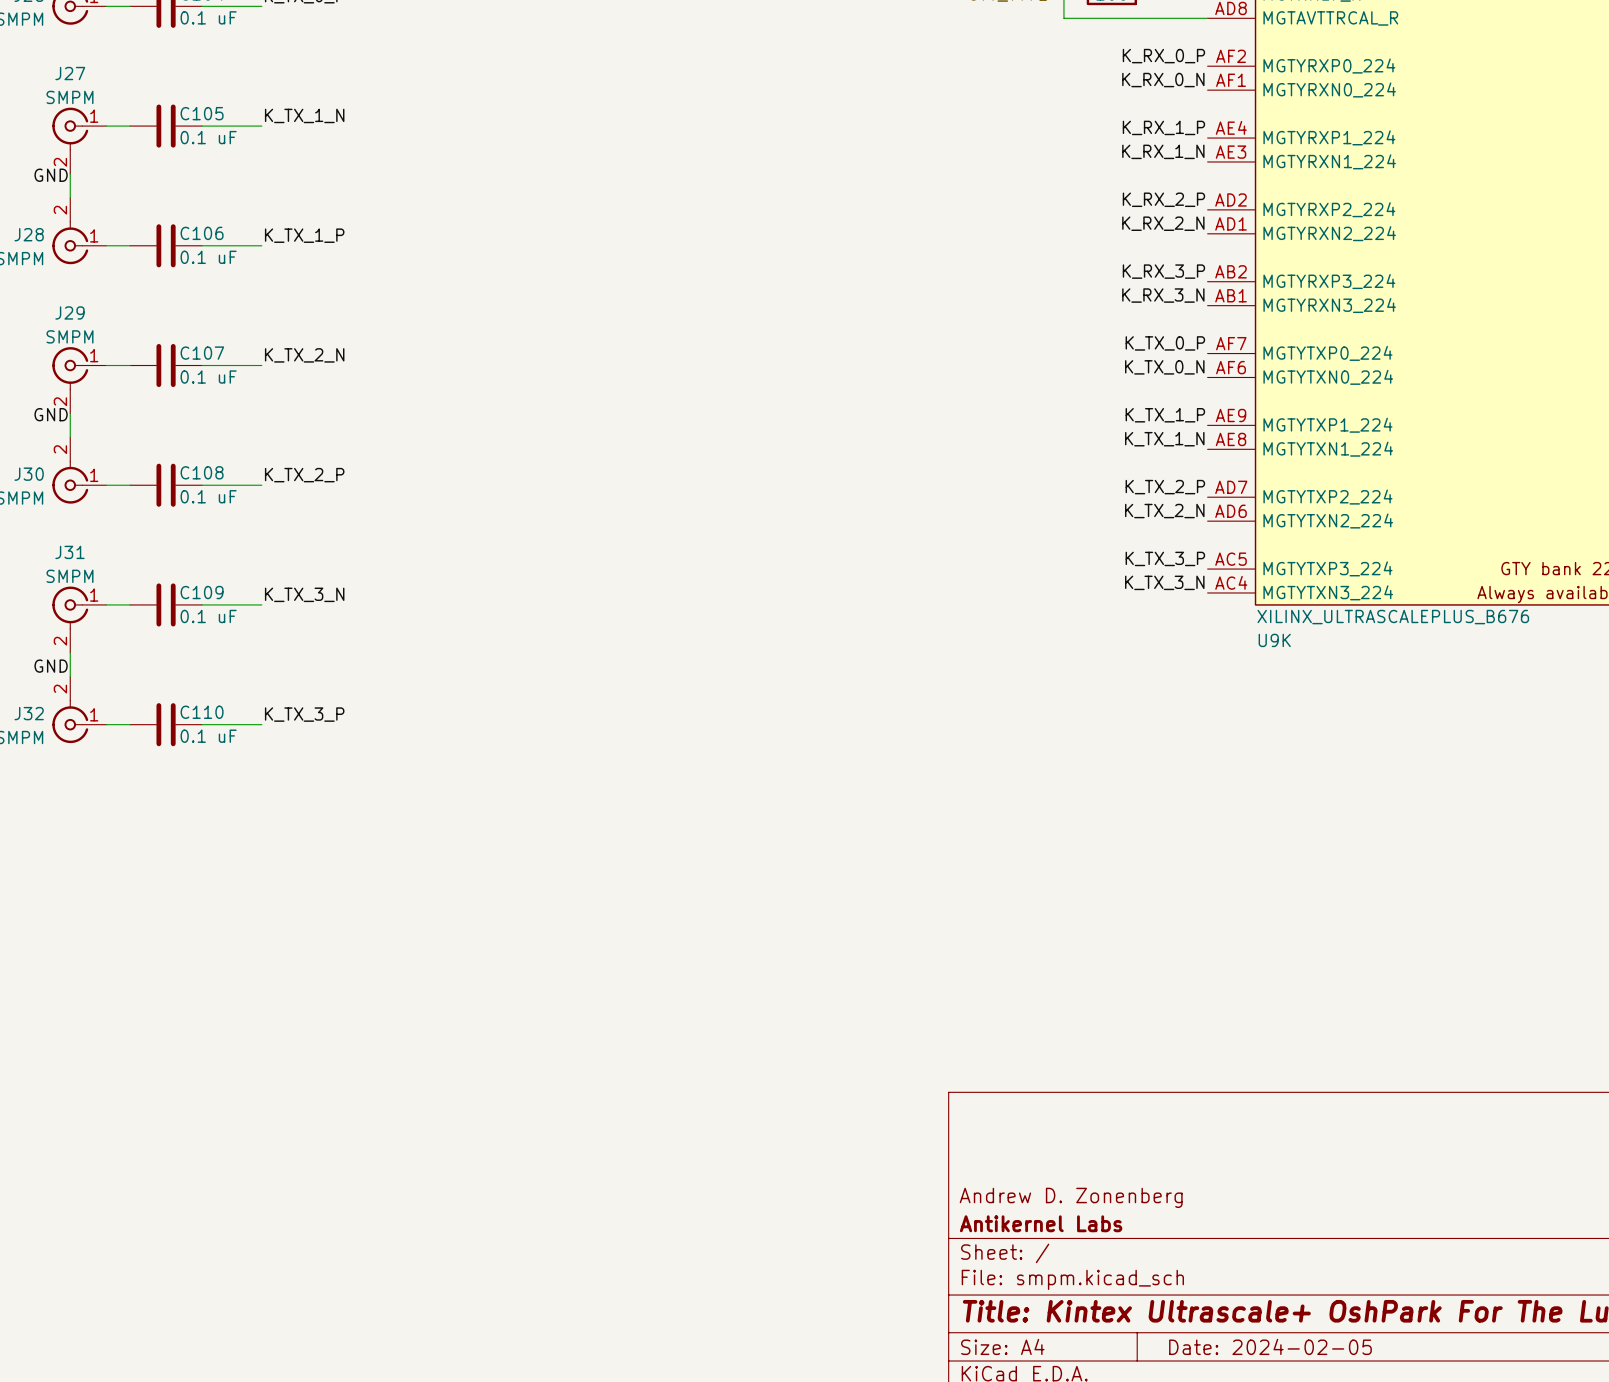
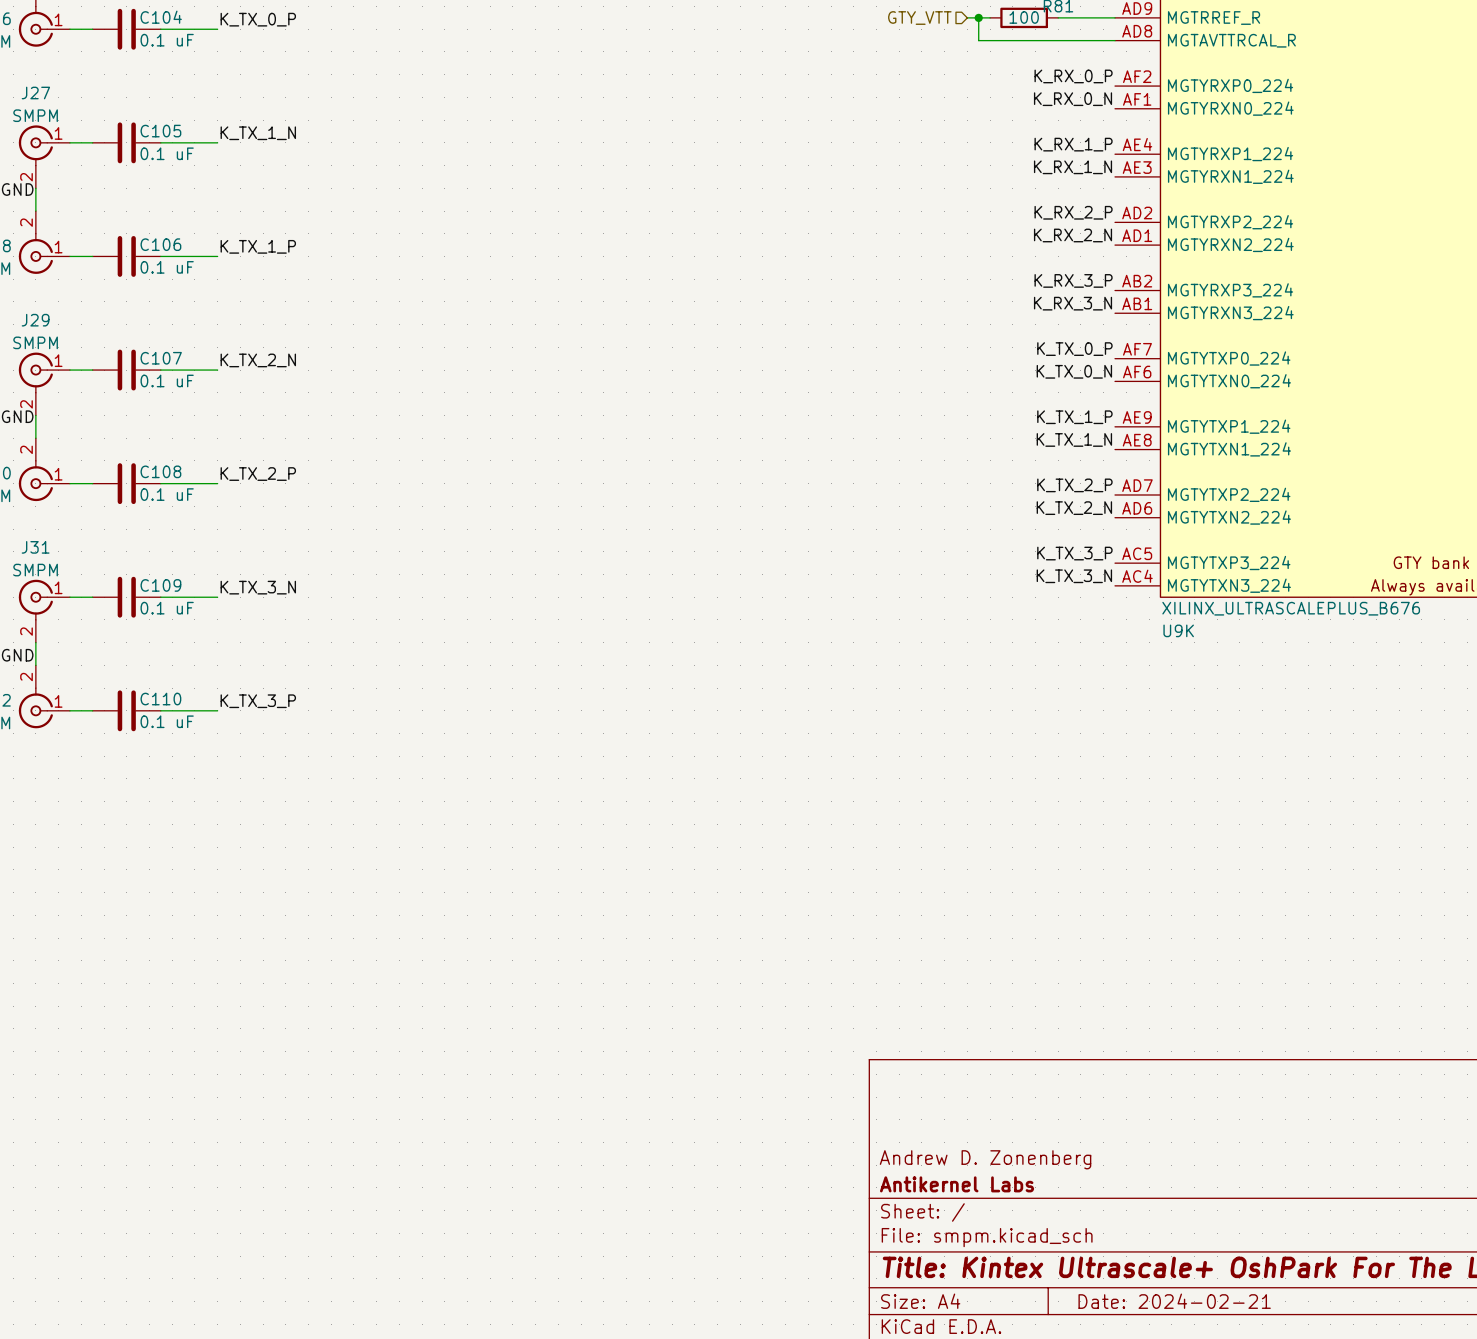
title block: Date: 2024-02-05 (1270, 1346) -> Date: 2024-02-21 (1174, 1301)

